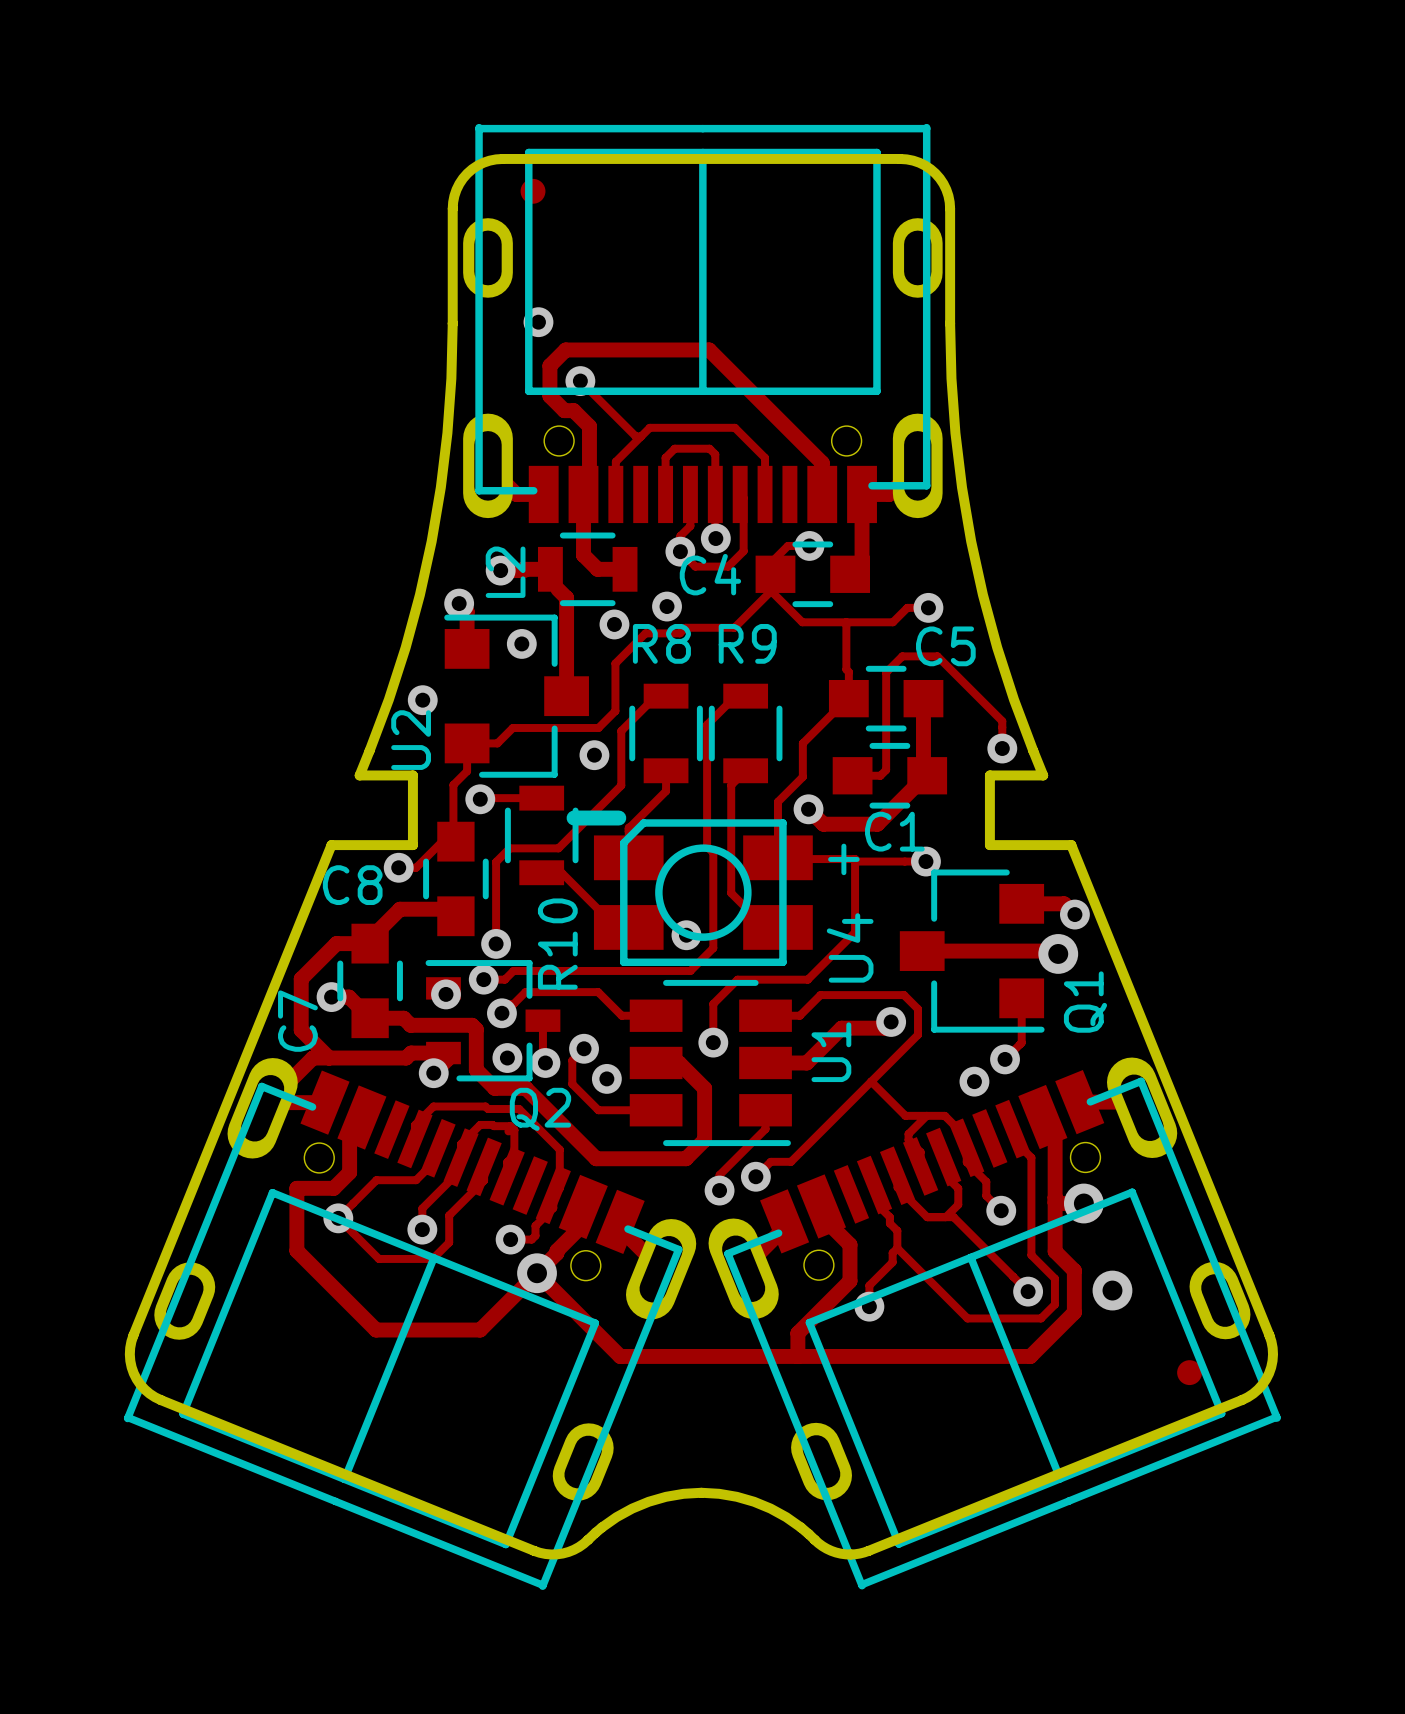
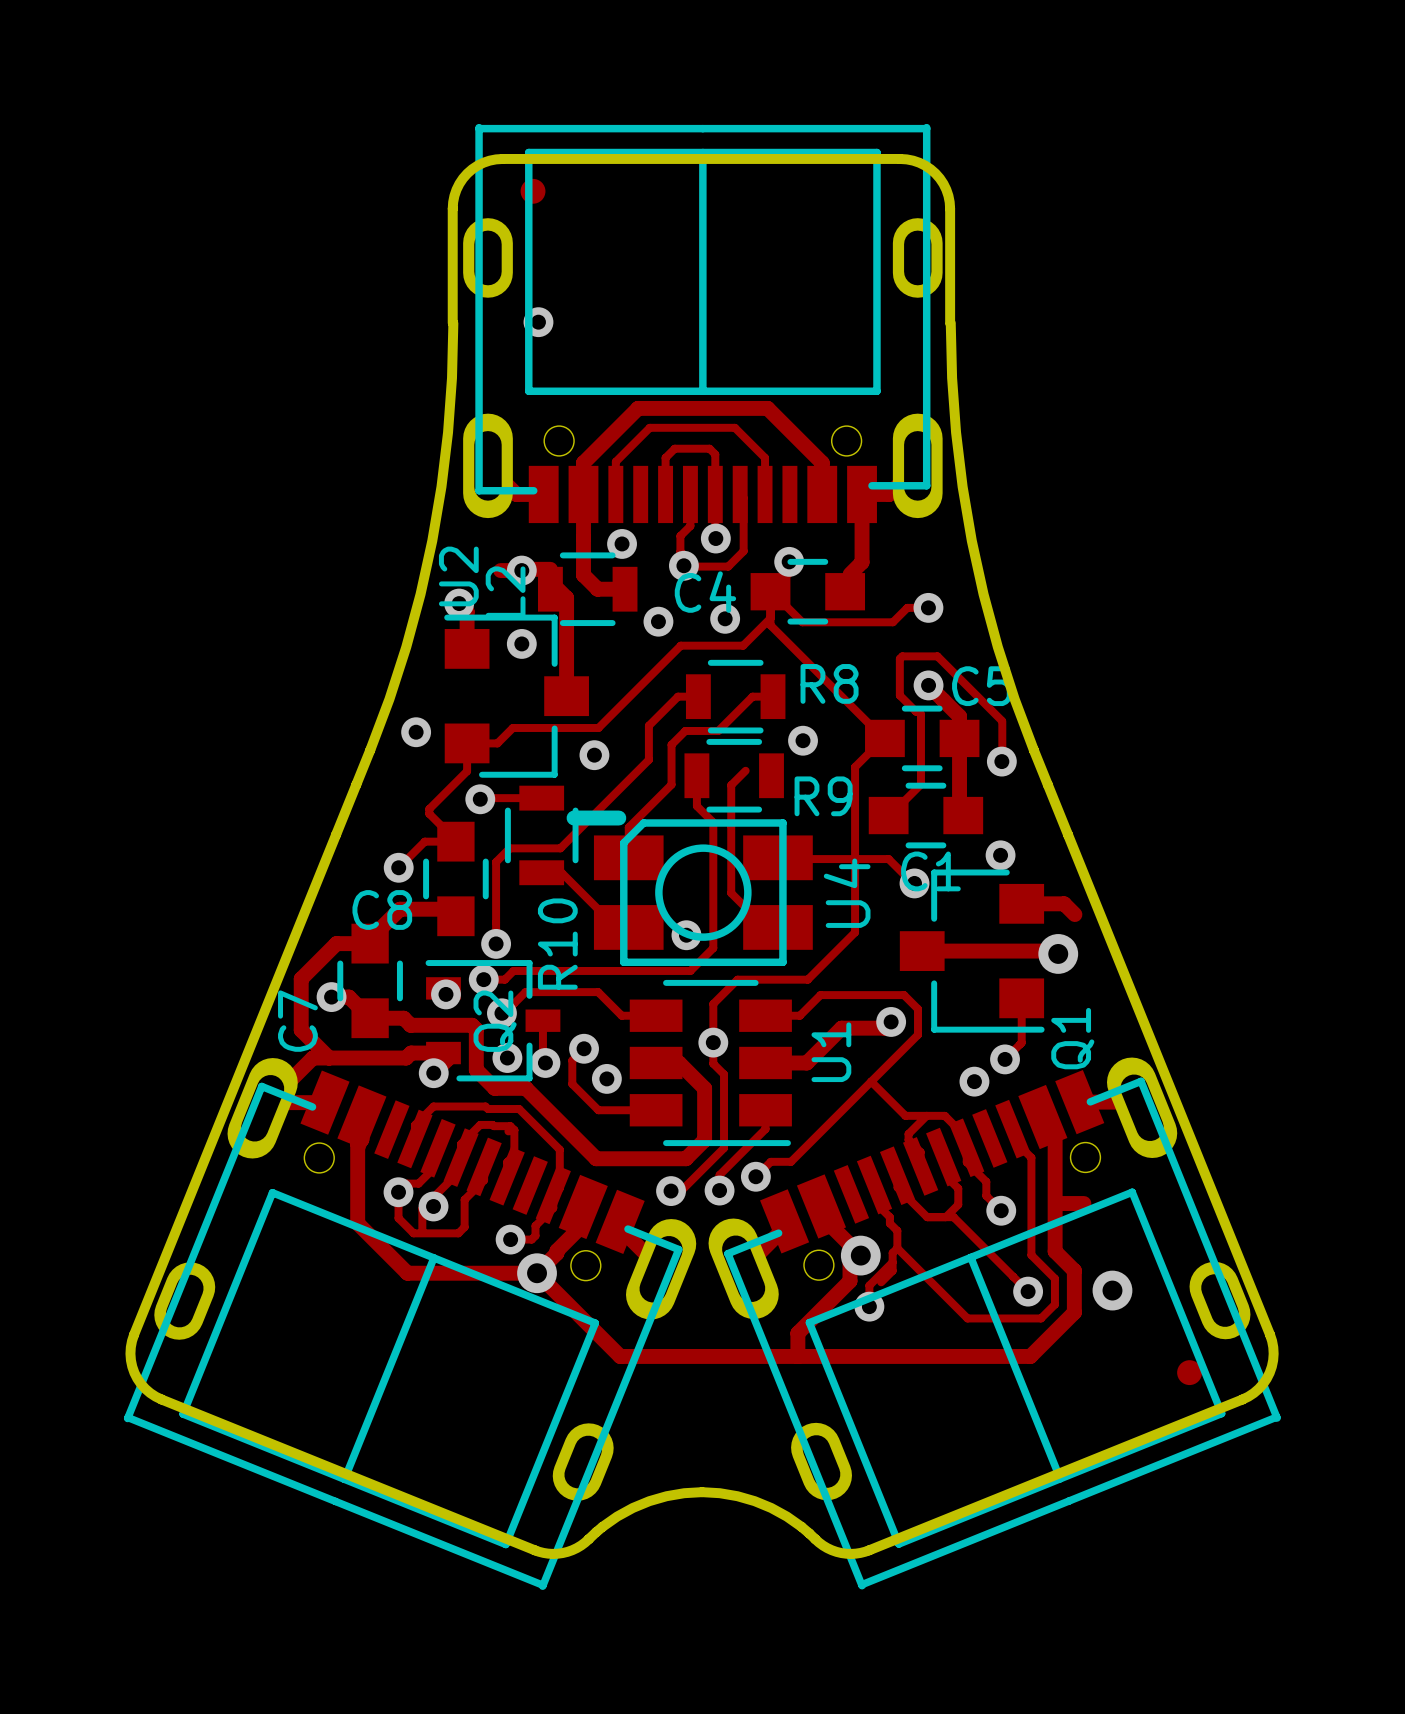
board edge: (452, 323) (447, 433) (431, 541) (405, 647) (388, 699) (359, 775) (412, 775) (412, 845) (331, 845) (133, 1335) (130, 1347) (130, 1360) (133, 1373) (140, 1384) (149, 1393) (160, 1400) (534, 1550) (551, 1554) (562, 1553) (573, 1549) (588, 1539) -> (453, 323) (448, 432) (441, 486) (420, 594) (406, 647) (370, 750) (134, 1334) (130, 1347) (130, 1360) (134, 1372) (140, 1383) (150, 1393) (161, 1399) (534, 1550) (548, 1553) (562, 1553) (576, 1548) (588, 1539)
board edge: (950, 323) (955, 433) (971, 541) (997, 647) (1014, 699) (1043, 775) (989, 775) (989, 845) (1071, 845) (1269, 1335) (1273, 1354) (1271, 1367) (1266, 1379) (1258, 1389) (1241, 1400) (859, 1553) (845, 1554) (831, 1550) (818, 1543) (786, 1517) (770, 1508) (736, 1496) (719, 1493) (683, 1493) (648, 1501) (616, 1517) (595, 1532) -> (950, 323) (956, 432) (962, 486) (971, 540) (997, 647) (1033, 750) (1270, 1334) (1273, 1347) (1271, 1366) (1263, 1383) (1253, 1393) (1242, 1399) (860, 1552) (846, 1553) (831, 1550) (819, 1542) (786, 1516) (771, 1507) (737, 1496) (719, 1493) (684, 1493) (649, 1501) (617, 1516) (596, 1532)
track: (580, 381) (635, 436) (641, 436) -> none
via: (580, 381) -> none
track: (767, 408) (709, 349) (565, 349) (549, 365) (549, 396) (564, 410) (573, 410) (589, 426) (589, 488) (583, 494) -> (767, 408) (638, 408) (583, 462) (583, 494)
via: none -> (622, 543)
track: (809, 545) (787, 545) (770, 563) (770, 591) (734, 627) (685, 627) (679, 633) (645, 633) (615, 663) (615, 711) -> (770, 618) (743, 645) (680, 645) (615, 711)
via position: (809, 545) -> (789, 561)
via position: (680, 551) -> (683, 565)
track: (583, 555) (597, 569) (625, 569) -> (583, 555) (583, 575) (597, 589) (625, 589)
track: none -> (789, 561) (789, 573) (770, 591) (770, 625) (883, 738) (855, 767) (855, 859) (888, 859) (914, 883)
L2 position: (587, 569) -> (587, 589)
via position: (500, 570) -> (521, 570)
C4 position: (812, 574) -> (807, 591)
via position: (667, 606) -> (658, 621)
via: none -> (725, 618)
track: (846, 622) (846, 669) (848, 672) (848, 698) (802, 743) (802, 776) (777, 801) (777, 857) -> none
via: (614, 624) -> none
track: (899, 658) (886, 672) (886, 770) (880, 775) (852, 775) -> (899, 658) (899, 695) (920, 714) (920, 784) (888, 815)
track: none -> (928, 685) (959, 716) (959, 811) (963, 815)
via: none -> (928, 685)
track: (666, 696) (656, 696) (621, 730) (621, 785) (558, 848) -> (698, 696) (678, 696) (648, 725) (648, 759) (558, 848)
track: (745, 696) (735, 696) (707, 724) (707, 846) (713, 852) -> (696, 775) (696, 806) (713, 822) (713, 852)
C5 position: (886, 698) -> (922, 738)
track: (923, 698) (923, 772) -> none
via position: (422, 700) -> (416, 732)
R8 rotation: 0° (666, 733) -> 90° clockwise (735, 696)
R8 position: (666, 733) -> (735, 696)
R9 rotation: 0° (745, 733) -> 90° clockwise (734, 775)
U2 name position: U2 (411, 740) -> U2 (458, 576)
via: none -> (803, 740)
via position: (1002, 748) -> (1001, 761)
track: (666, 770) (666, 791) (628, 828) -> (773, 696) (752, 696) (718, 730) (685, 730) (671, 744) (671, 784) (628, 827)
C1 position: (889, 775) -> (925, 815)
track: (927, 775) (877, 824) (823, 824) (808, 809) -> none
track: (453, 784) (453, 837) -> (453, 784) (429, 809) (429, 813) (453, 837)
via: (808, 809) -> none
track: (442, 841) (416, 867) (398, 867) -> (442, 841) (424, 841) (398, 867)
via: none -> (1000, 855)
text: + (843, 859) -> none
track: (855, 859) (857, 861) (925, 861) -> none
via position: (925, 861) -> (914, 883)
C8 name position: C8 (352, 885) -> C8 (382, 909)
via: (1074, 914) -> none
U4 name position: U4 (850, 947) -> U4 (847, 893)
Q1 name position: Q1 (1085, 1002) -> Q1 (1072, 1038)
track: none -> (713, 1042) (713, 1063) (724, 1074) (724, 1148) (681, 1191) (671, 1191)
Q2 name rotation: 0° (540, 1109) -> 90° counterclockwise (495, 1021)
Q2 name position: Q2 (540, 1109) -> Q2 (495, 1021)
track: (361, 1117) (349, 1129) (349, 1172) (333, 1188) (296, 1188) (296, 1250) (376, 1330) (480, 1330) (537, 1273) -> (361, 1117) (361, 1139) (357, 1143) (357, 1223) (407, 1273) (537, 1273)
track: (431, 1170) (425, 1170) (416, 1180) (376, 1180) (338, 1218) (378, 1258) (432, 1258) (449, 1242) (449, 1215) (464, 1199) -> (431, 1170) (418, 1183) (407, 1183) (398, 1192) (398, 1218) (413, 1233) (458, 1233) (464, 1227) (464, 1199)
via: none -> (671, 1191)
via: none -> (398, 1192)
via position: (1083, 1203) -> (860, 1255)
via: (338, 1218) -> none
via position: (422, 1229) -> (433, 1206)
track: none -> (892, 1262) (892, 1270) (881, 1282)

